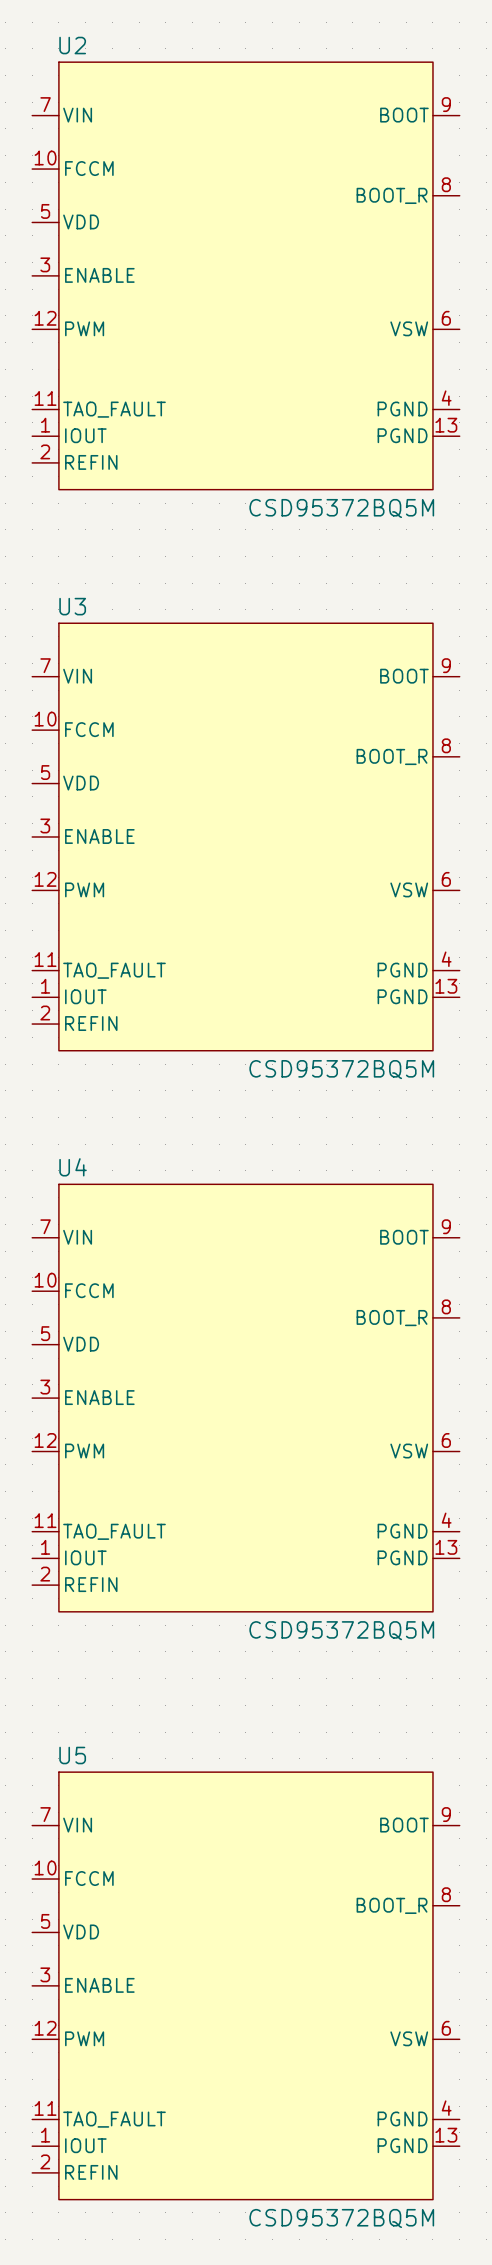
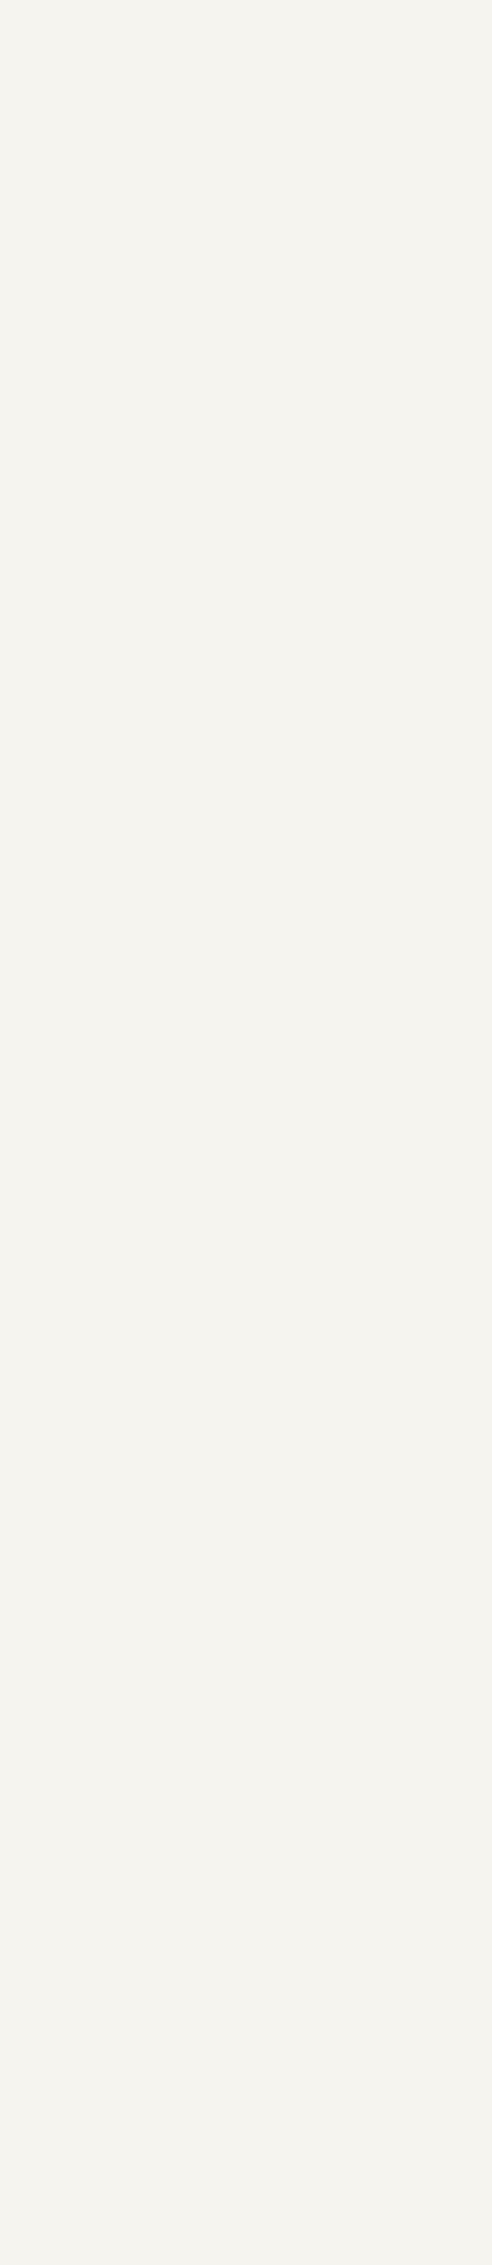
U2: CSD95372BQ5M (245, 275) -> none
U3: CSD95372BQ5M (245, 836) -> none
U4: CSD95372BQ5M (245, 1398) -> none
U5: CSD95372BQ5M (245, 1985) -> none

